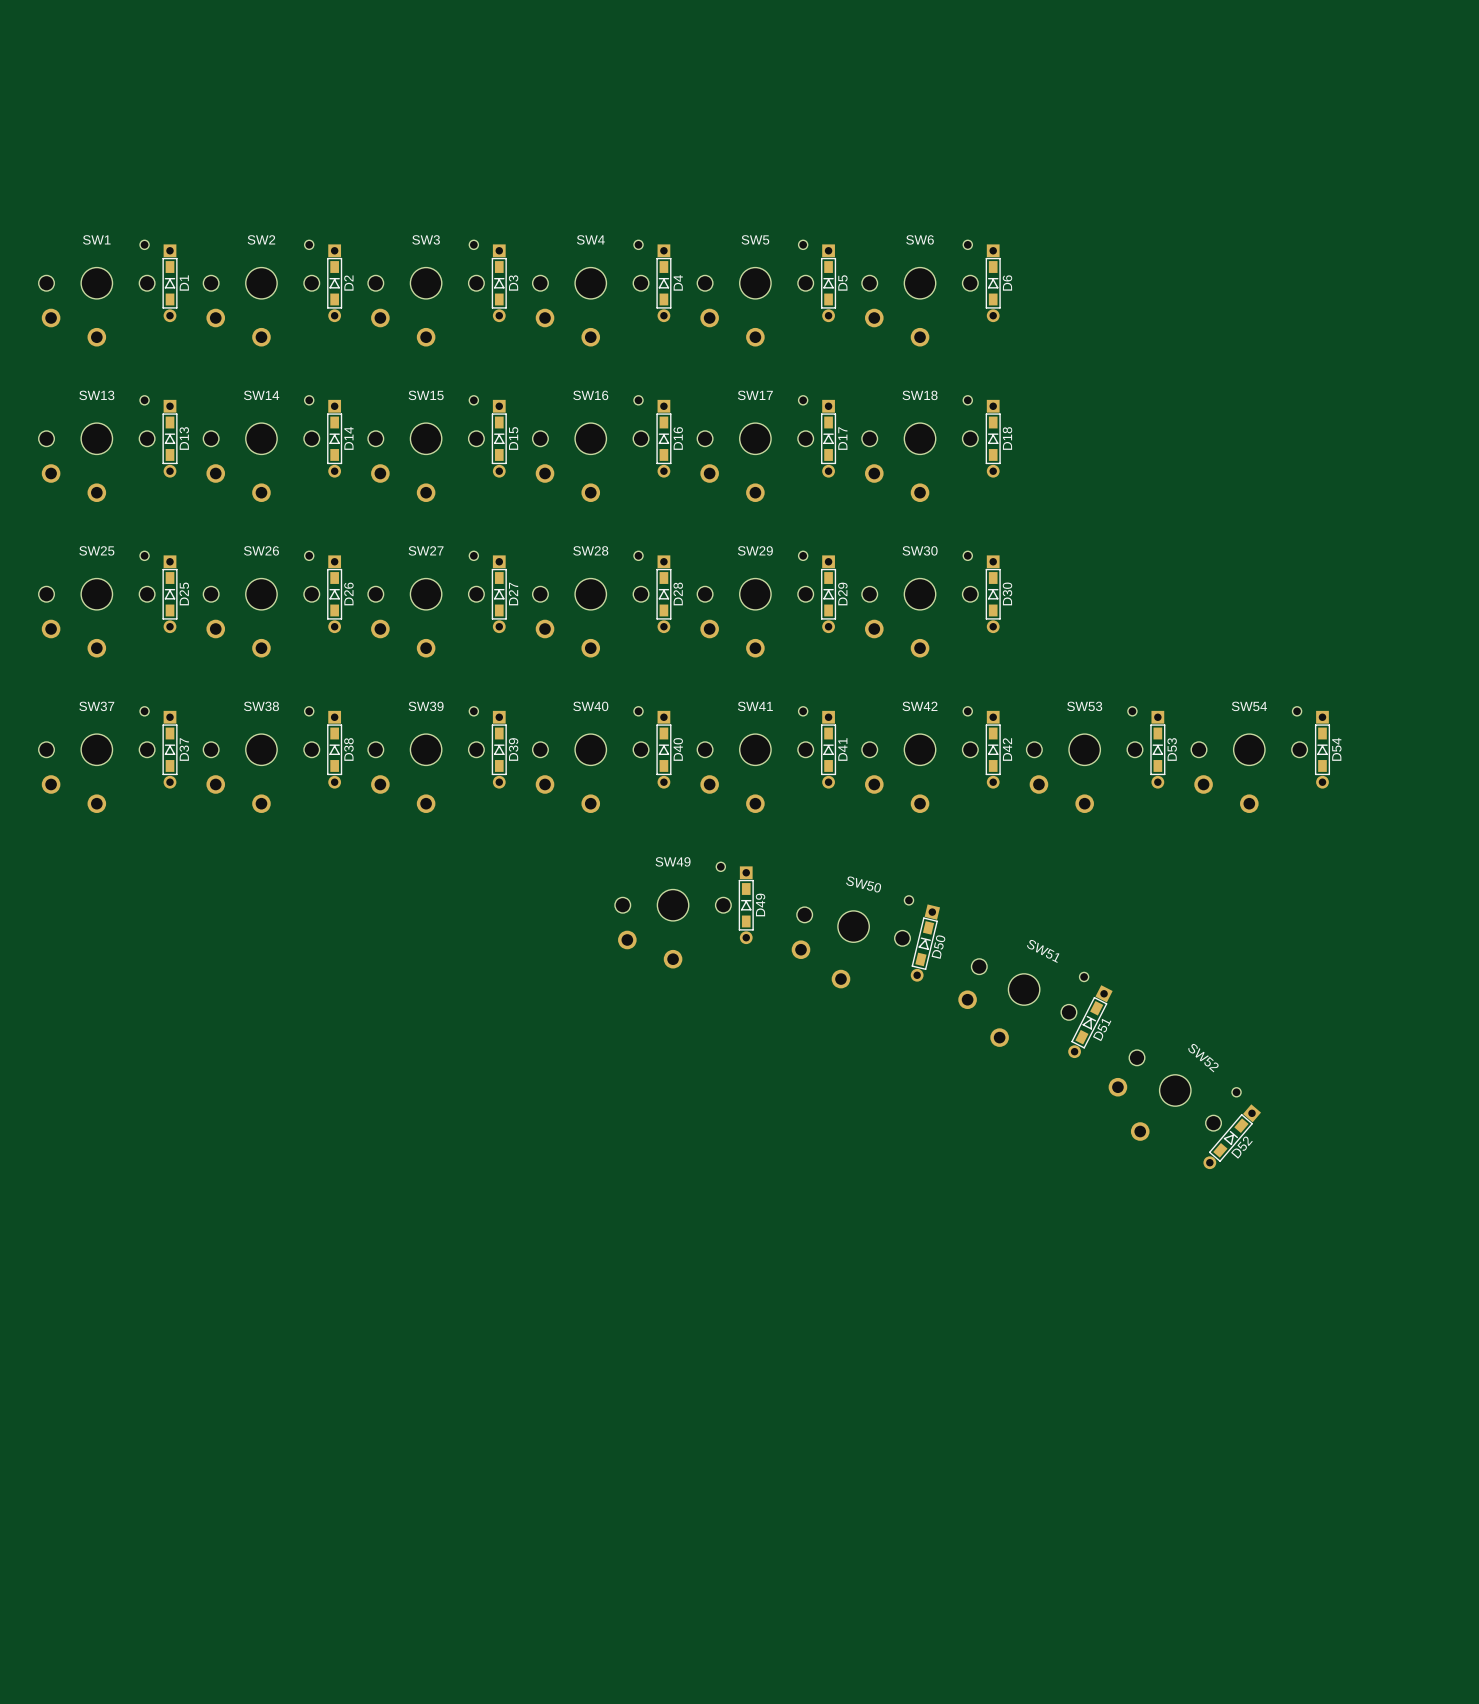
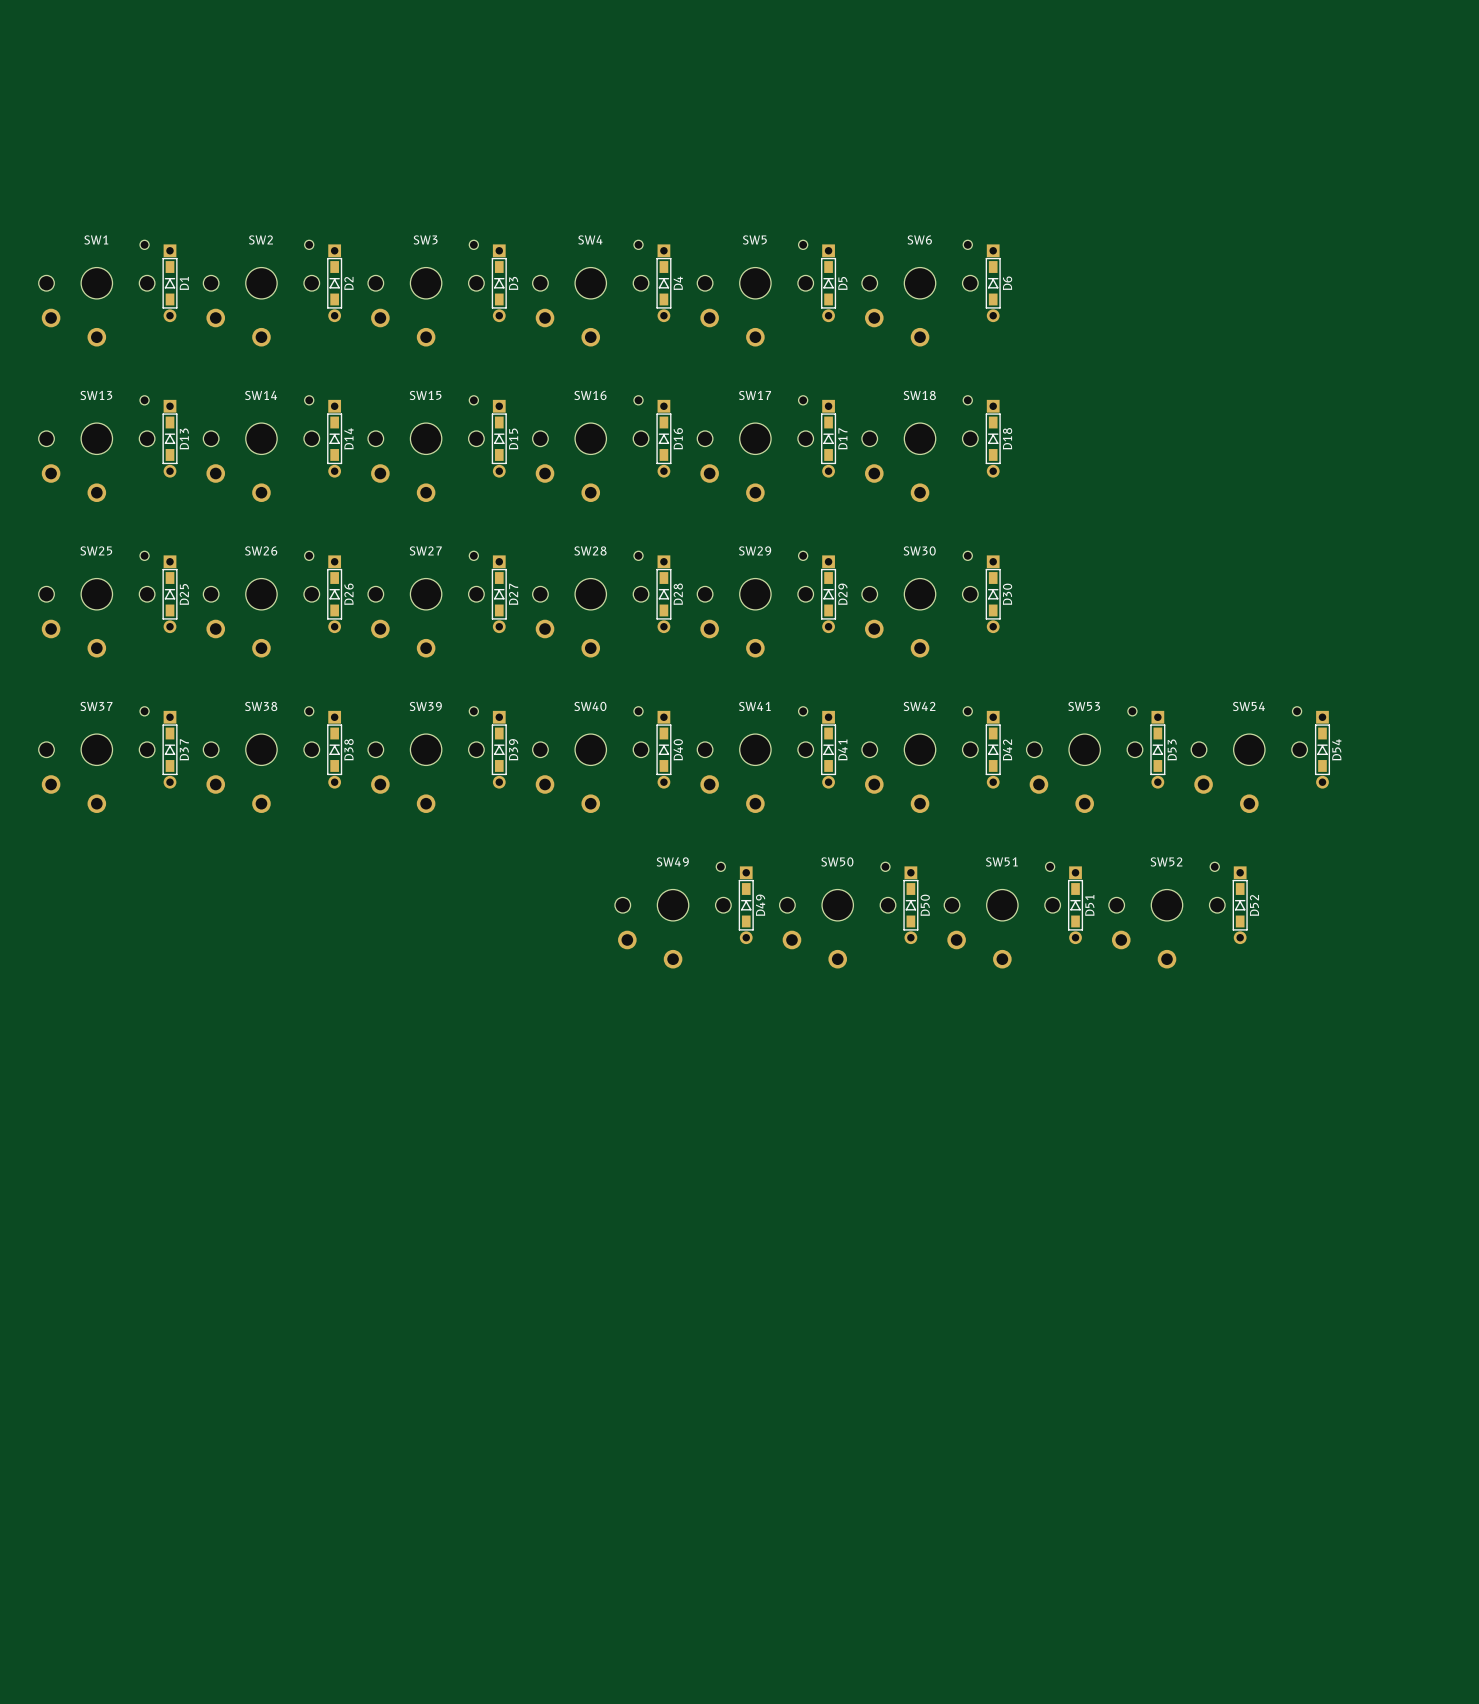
SW50 rotation: 0° (852, 942) -> 13.5° counterclockwise (837, 915)
D50 rotation: 0° (925, 943) -> 13.5° counterclockwise (910, 905)
SW51 rotation: 0° (1023, 1002) -> 27° counterclockwise (1002, 915)
SW51 position: (1023, 1002) -> (1002, 915)
D51 rotation: 0° (1090, 1021) -> 27° counterclockwise (1075, 905)
D51 position: (1090, 1021) -> (1075, 905)
SW52 rotation: 0° (1174, 1095) -> 40.5° counterclockwise (1166, 915)
SW52 position: (1174, 1095) -> (1166, 915)
D52 rotation: 0° (1232, 1136) -> 40.5° counterclockwise (1240, 905)
D52 position: (1232, 1136) -> (1240, 905)

